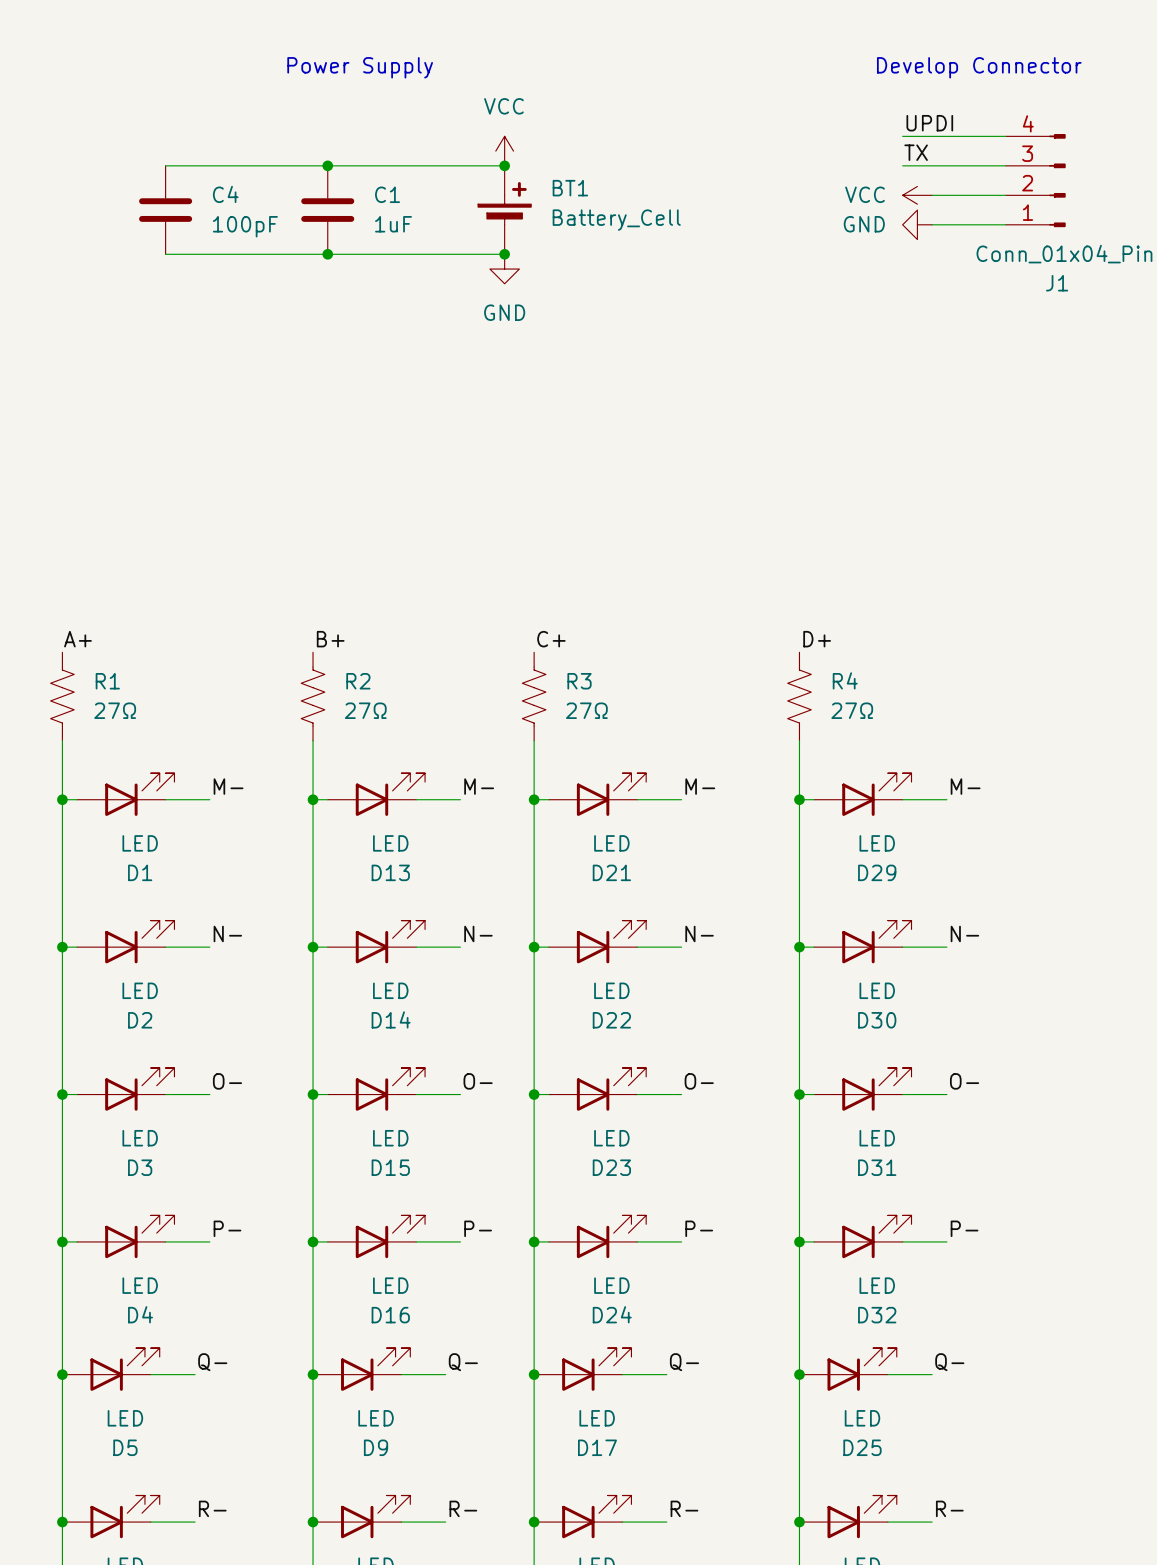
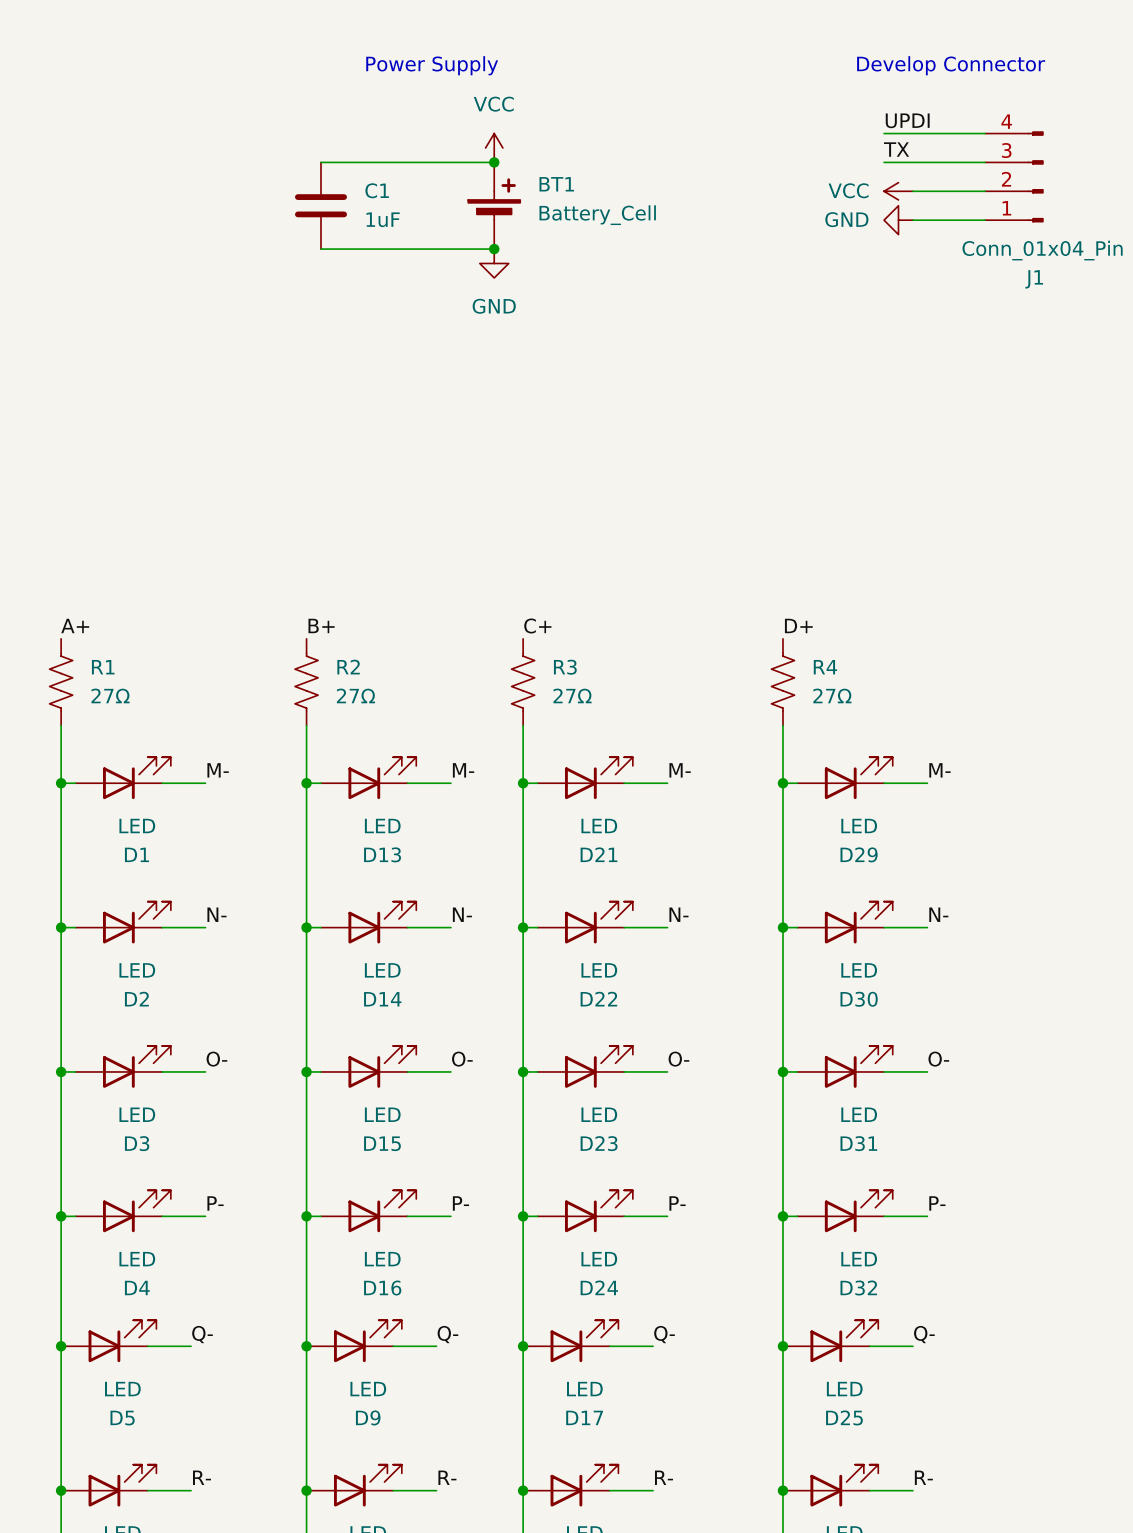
text position: Power Supply (360, 67) -> Power Supply (432, 65)
wire: (165, 165) (327, 165) -> none
junction: (327, 165) -> none
C4: 100pF (165, 210) -> none
wire: (165, 254) (327, 254) -> none
junction: (327, 254) -> none

